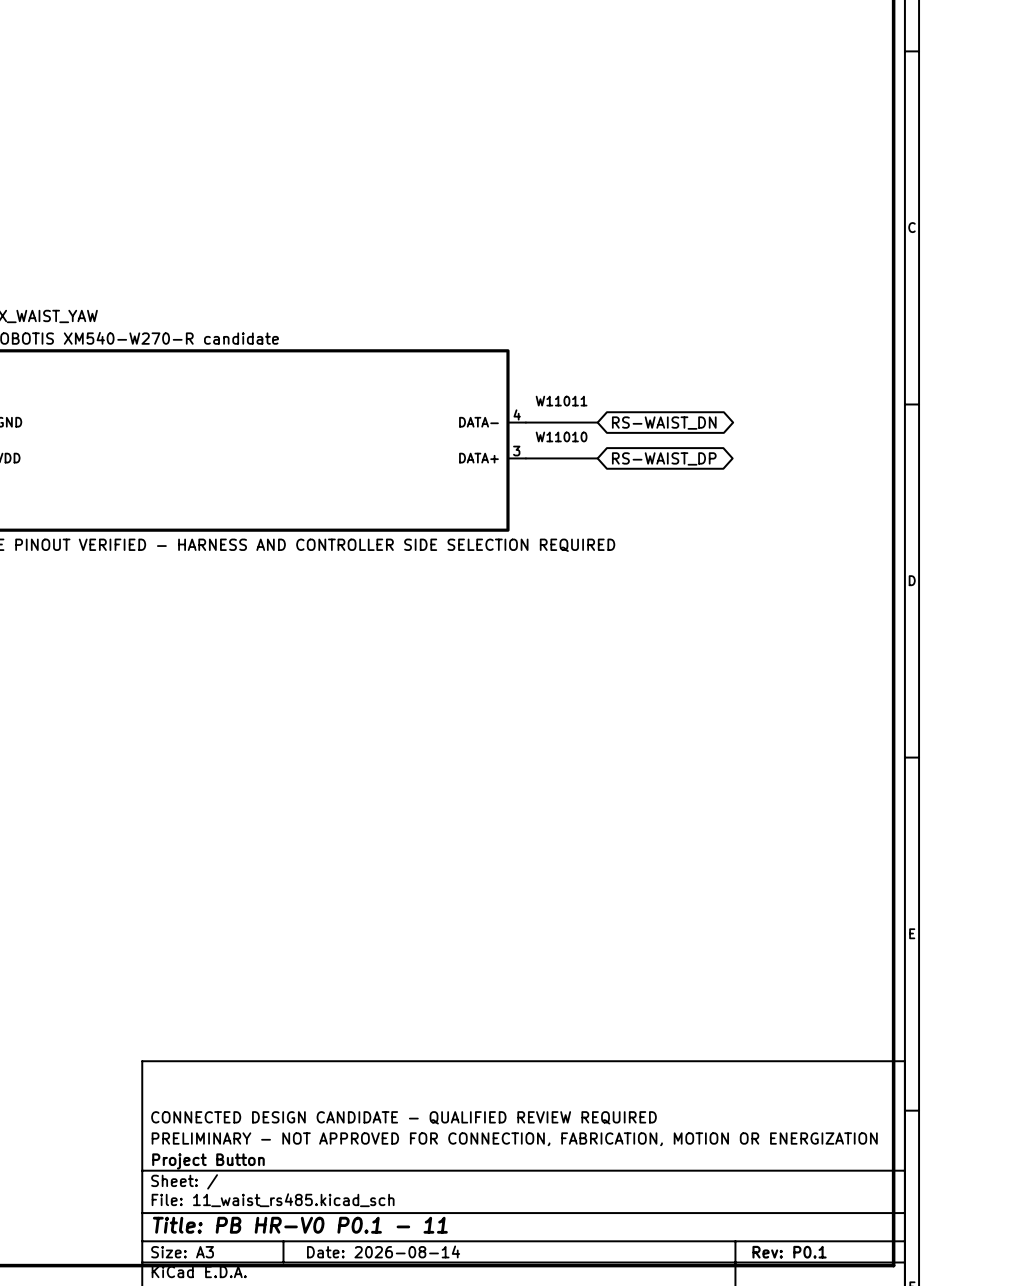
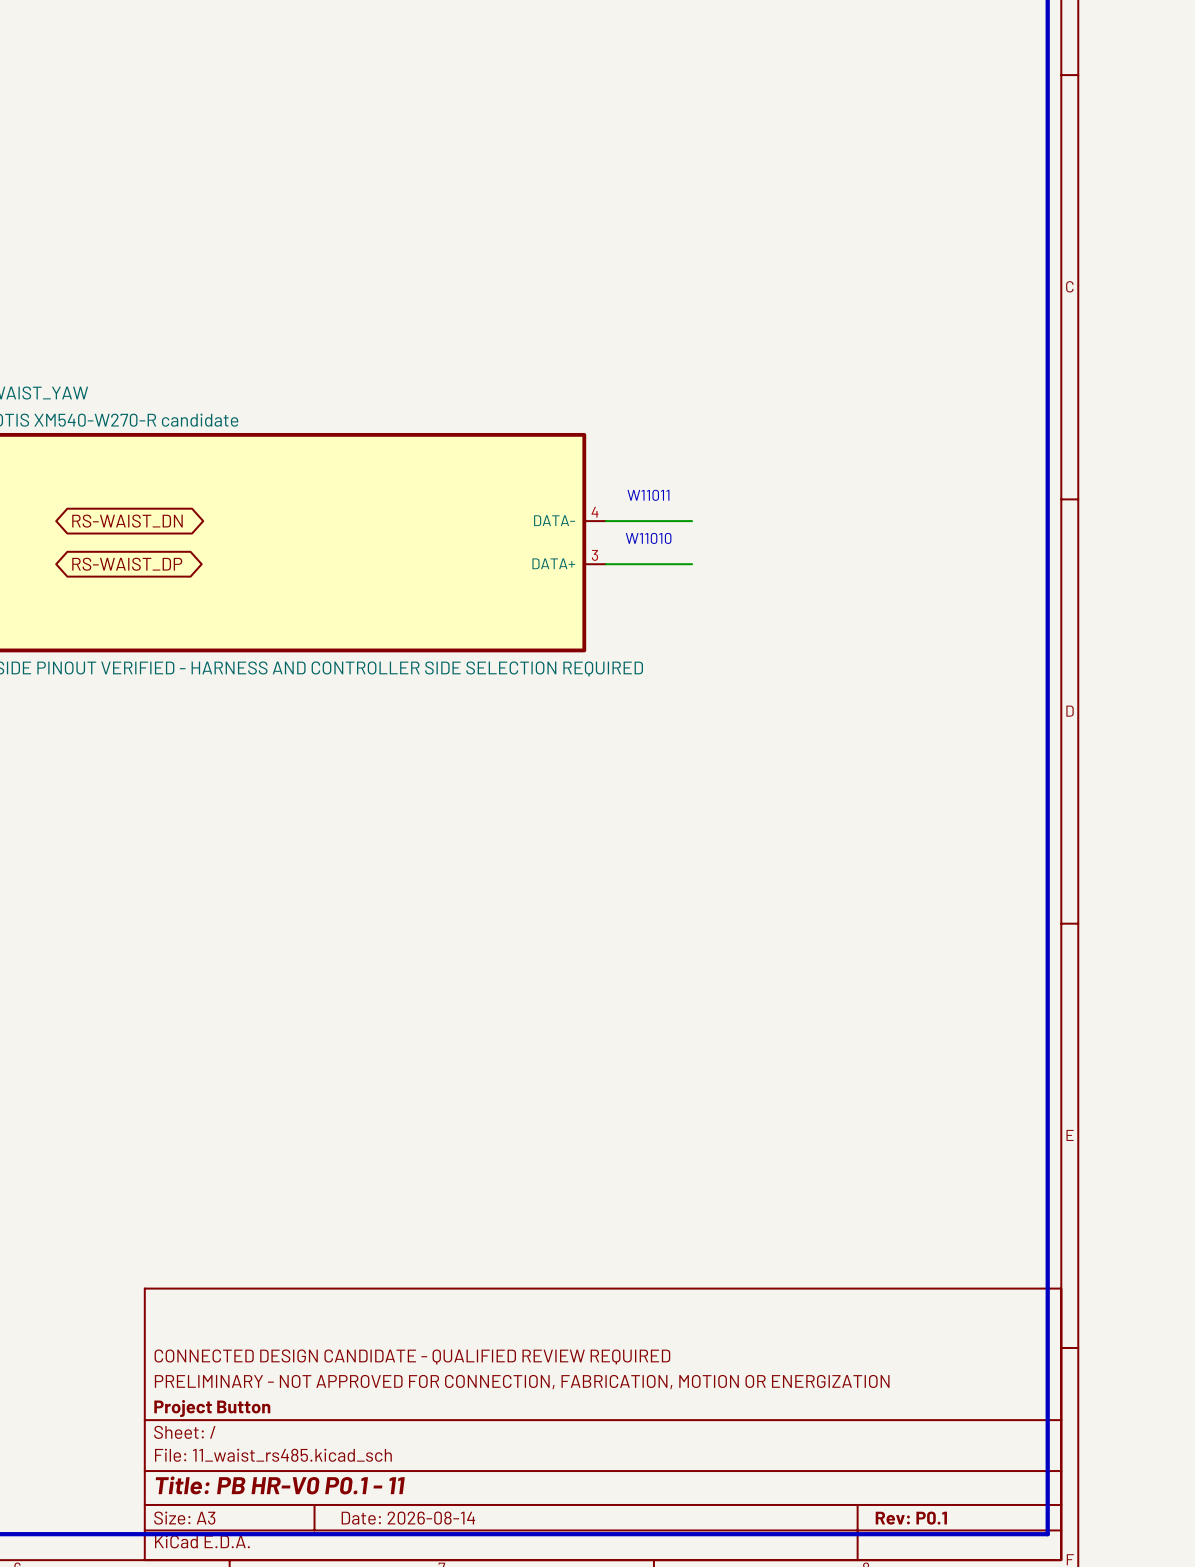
global label: none -> RS-WAIST_DN (127, 521)
global label: RS-WAIST_DN (664, 423) -> none
global label: none -> RS-WAIST_DP (127, 564)
global label: RS-WAIST_DP (664, 458) -> none

